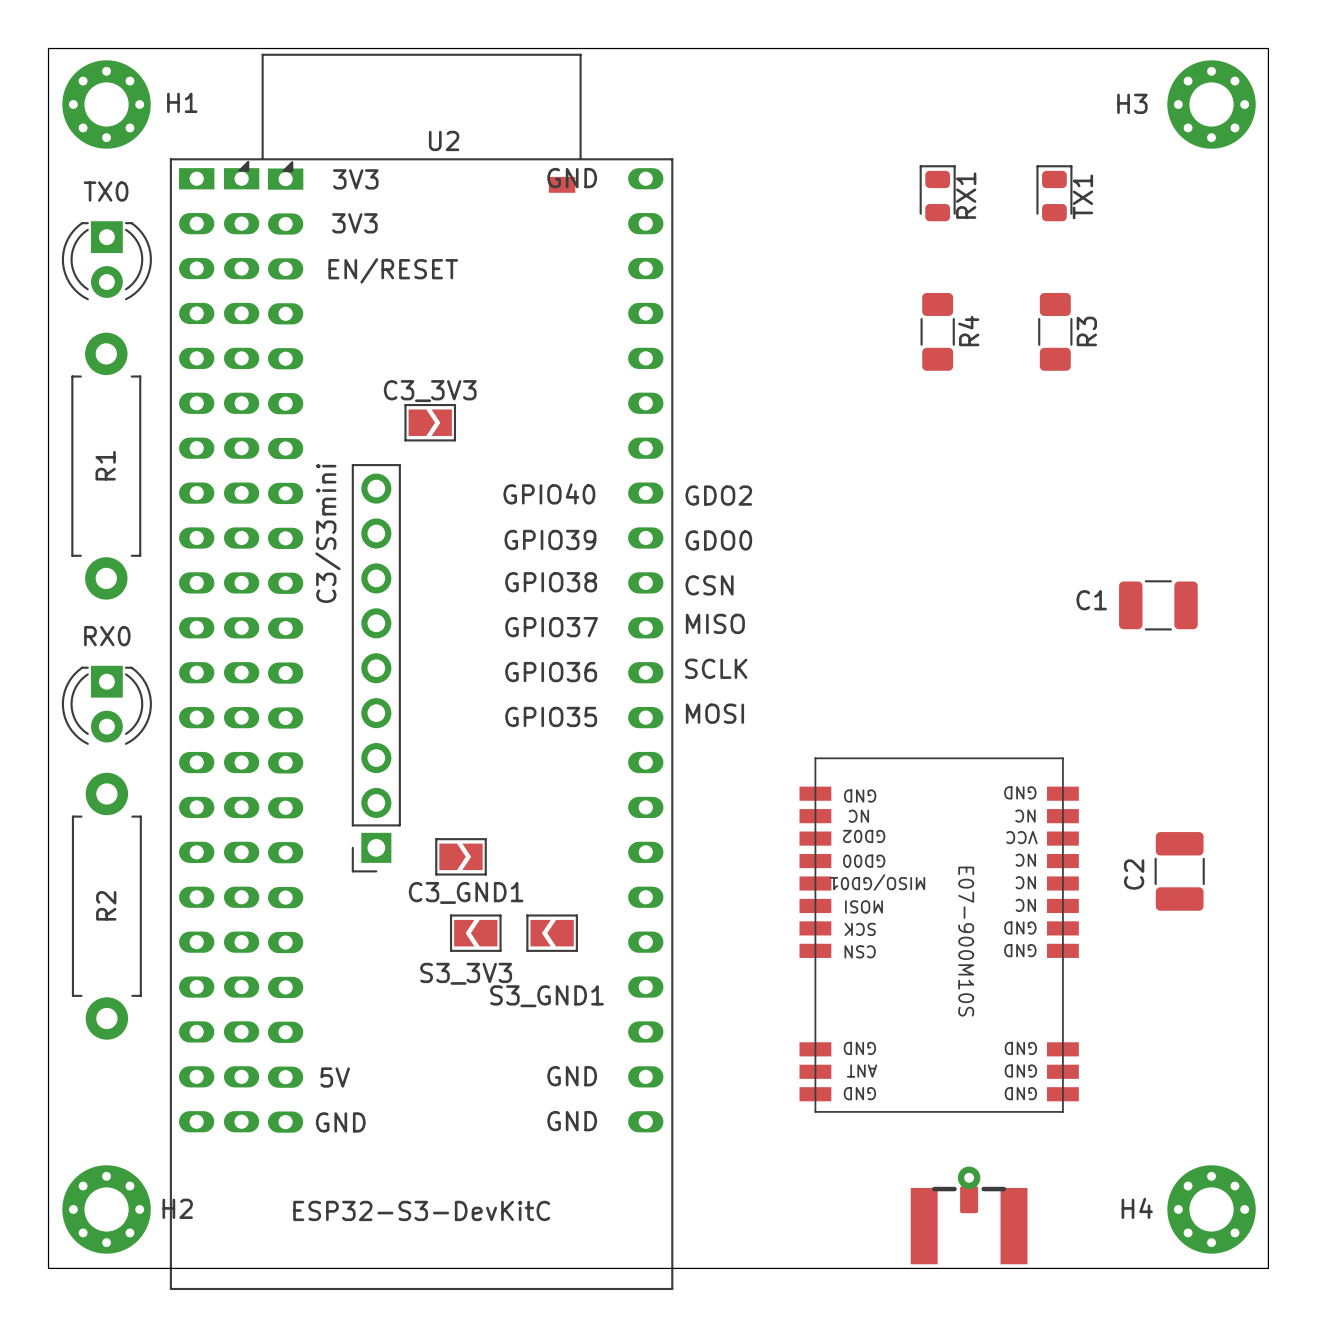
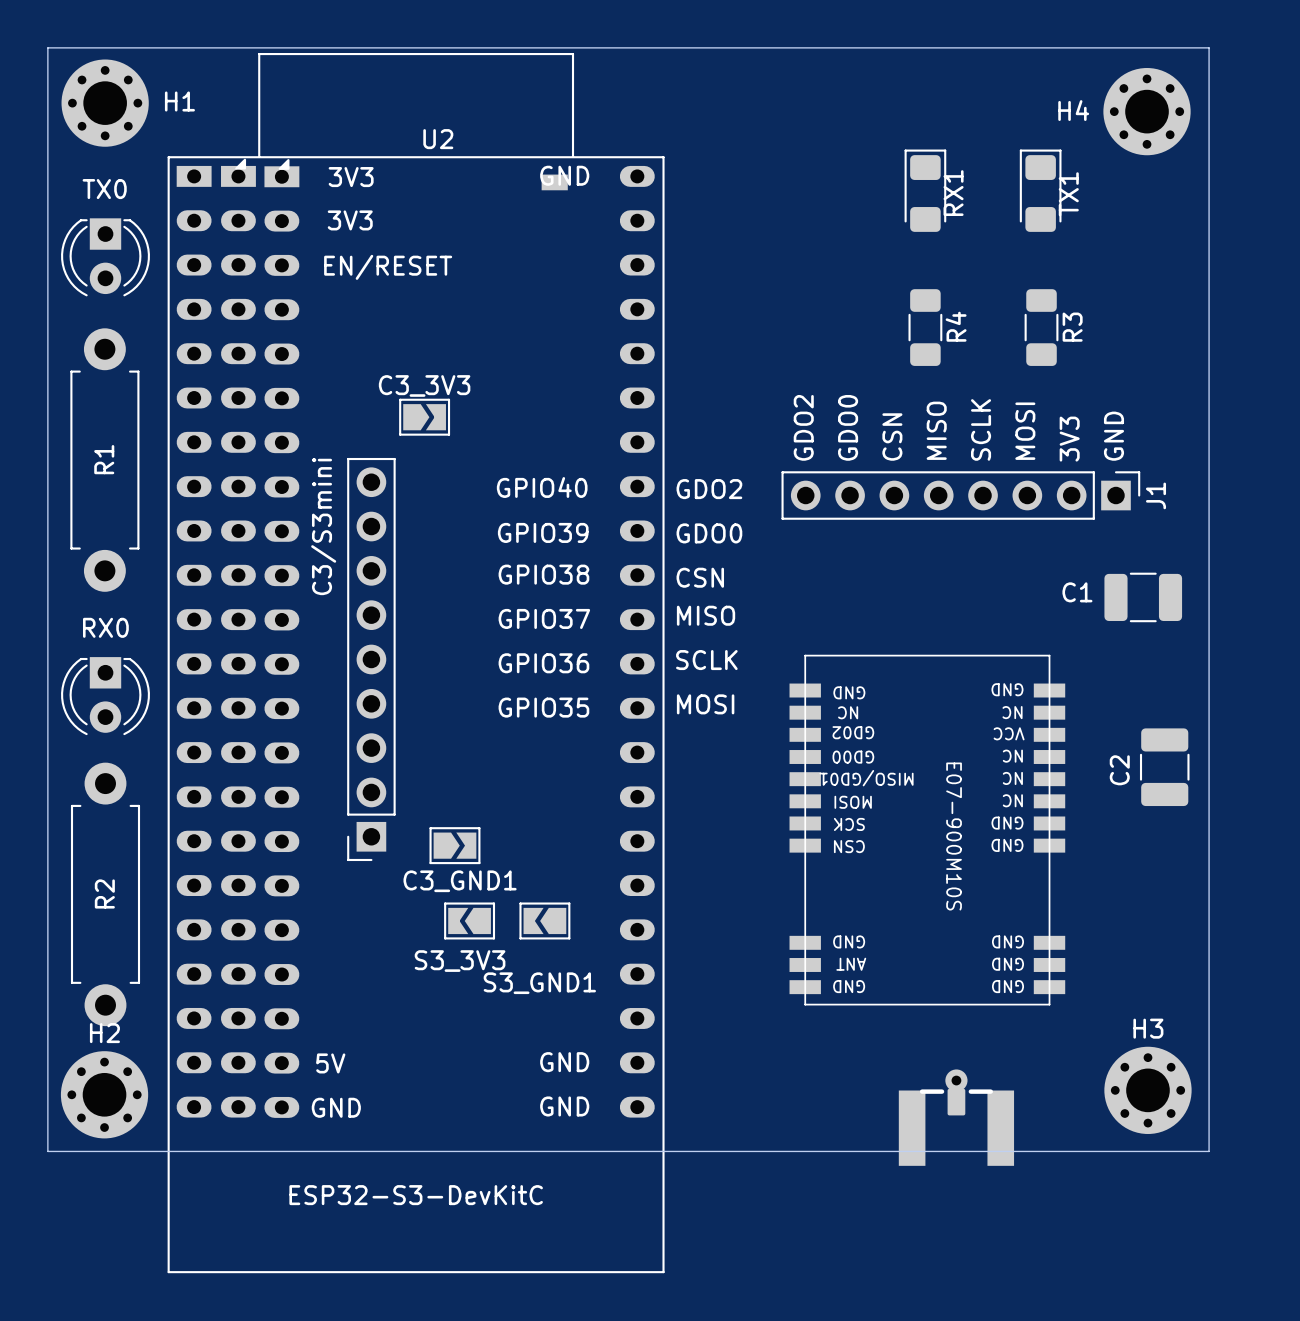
board edge: (1225, 48) (1268, 48) (1268, 1268) (48, 1268) (48, 1166) -> (1209, 47) (1209, 1151) (47, 1151)
H3 name position: H3 (1132, 103) -> H3 (1148, 1028)
H3 position: (1211, 104) -> (1147, 1090)
RX1 footprint: [919, 165, 956, 222] -> [904, 149, 947, 232]
TX1 footprint: [1036, 165, 1073, 222] -> [1019, 149, 1062, 232]
text: none -> GDO2 (803, 427)
text: none -> GDO0 (848, 427)
text: none -> SCLK (981, 429)
text: none -> MISO (936, 430)
text: none -> MOSI (1025, 431)
text: none -> GND (1113, 436)
text: none -> CSN (892, 437)
text: none -> 3V3 (1069, 439)
J1: none -> (960, 495)
C2 position: (1179, 871) -> (1164, 767)
part position: (939, 935) -> (927, 830)
H2 name position: H2 (177, 1208) -> H2 (104, 1033)
H2 position: (106, 1209) -> (104, 1094)
H4 position: (1211, 1209) -> (1147, 111)
part position: (969, 1215) -> (956, 1117)

